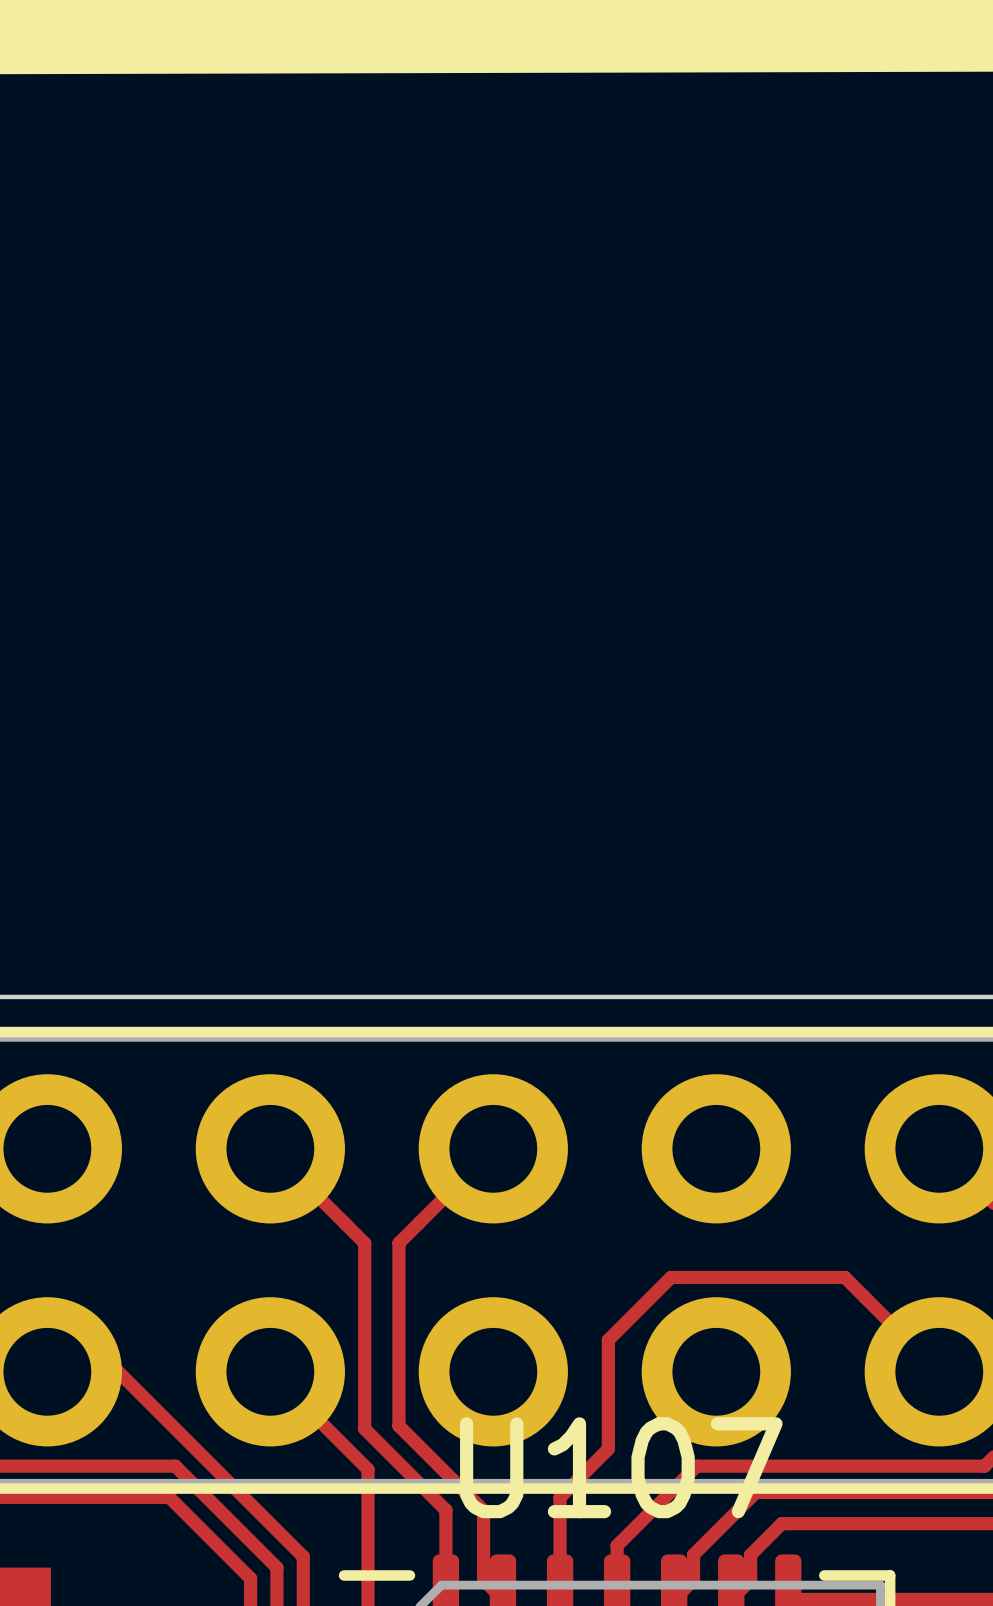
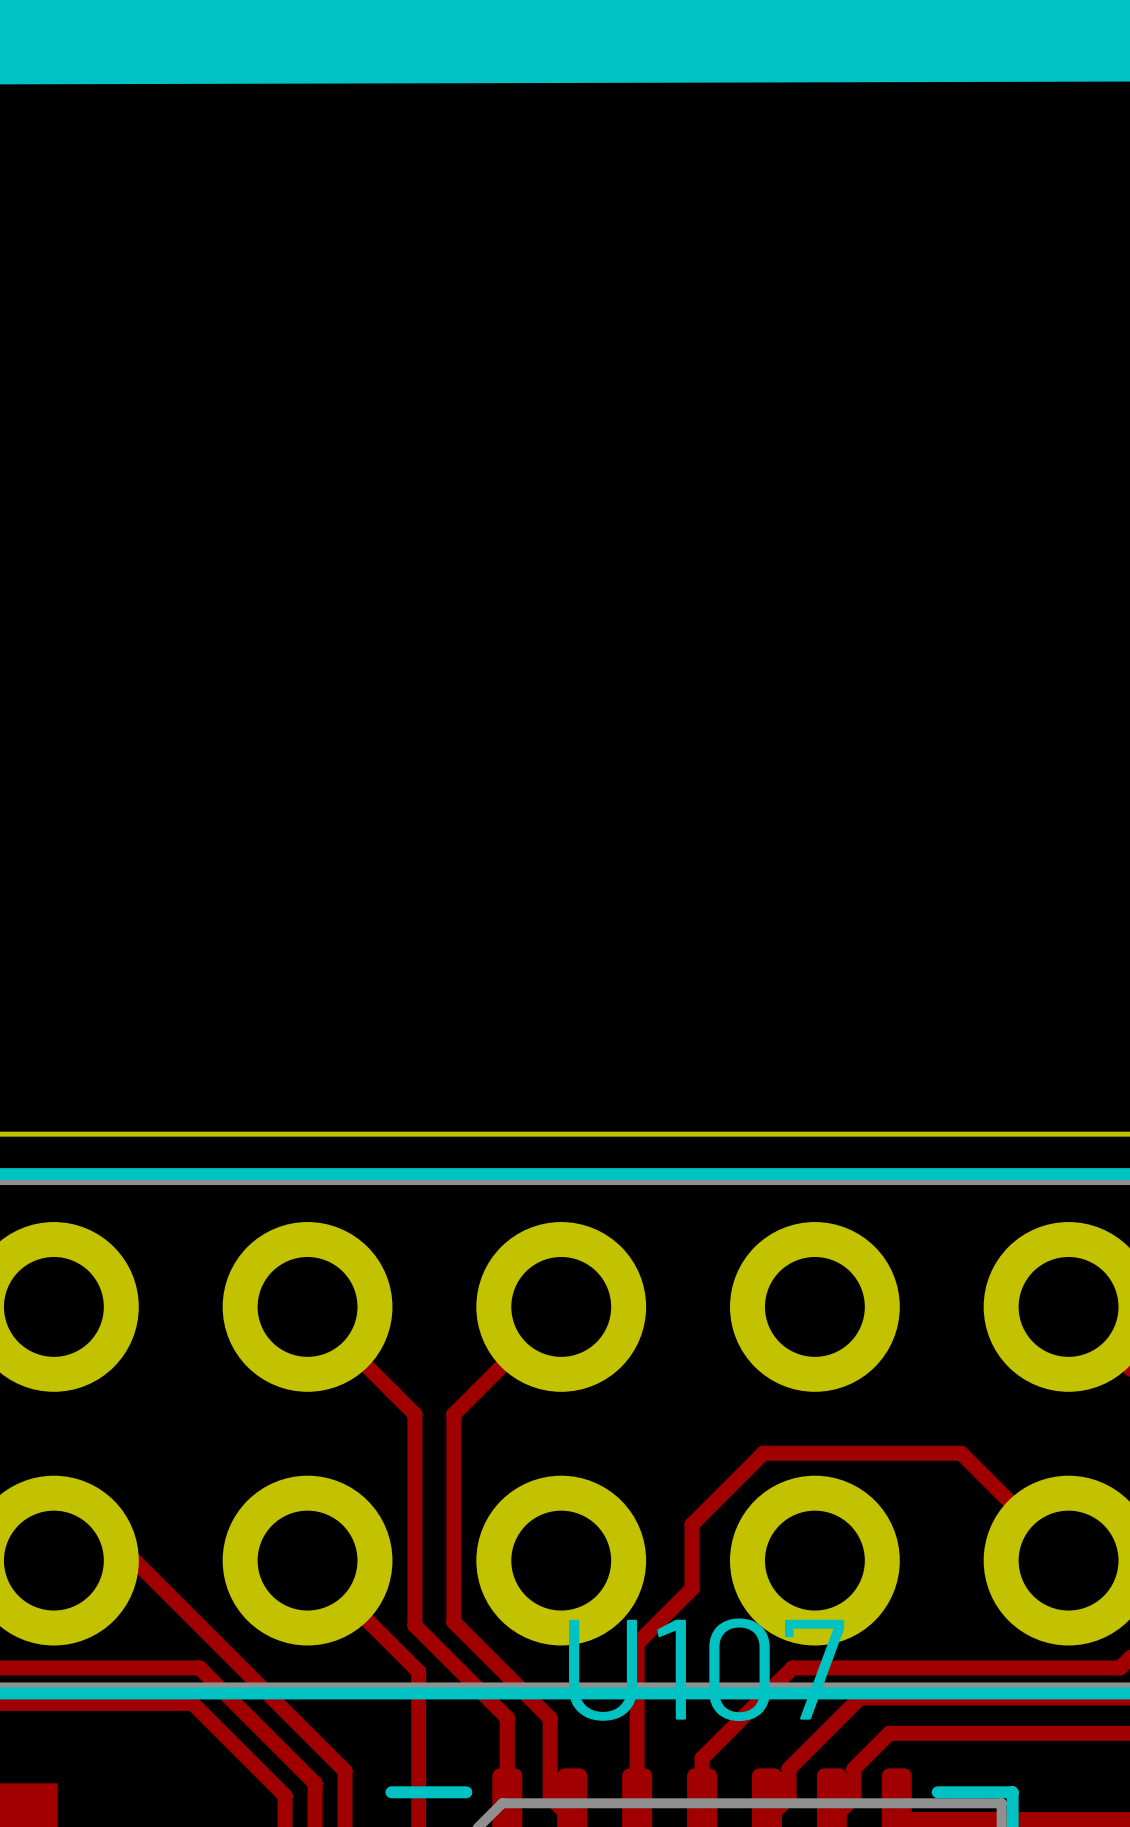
track: (608, 1396) (608, 1449) (560, 1497) -> (692, 1588) (637, 1643) (637, 1703)

